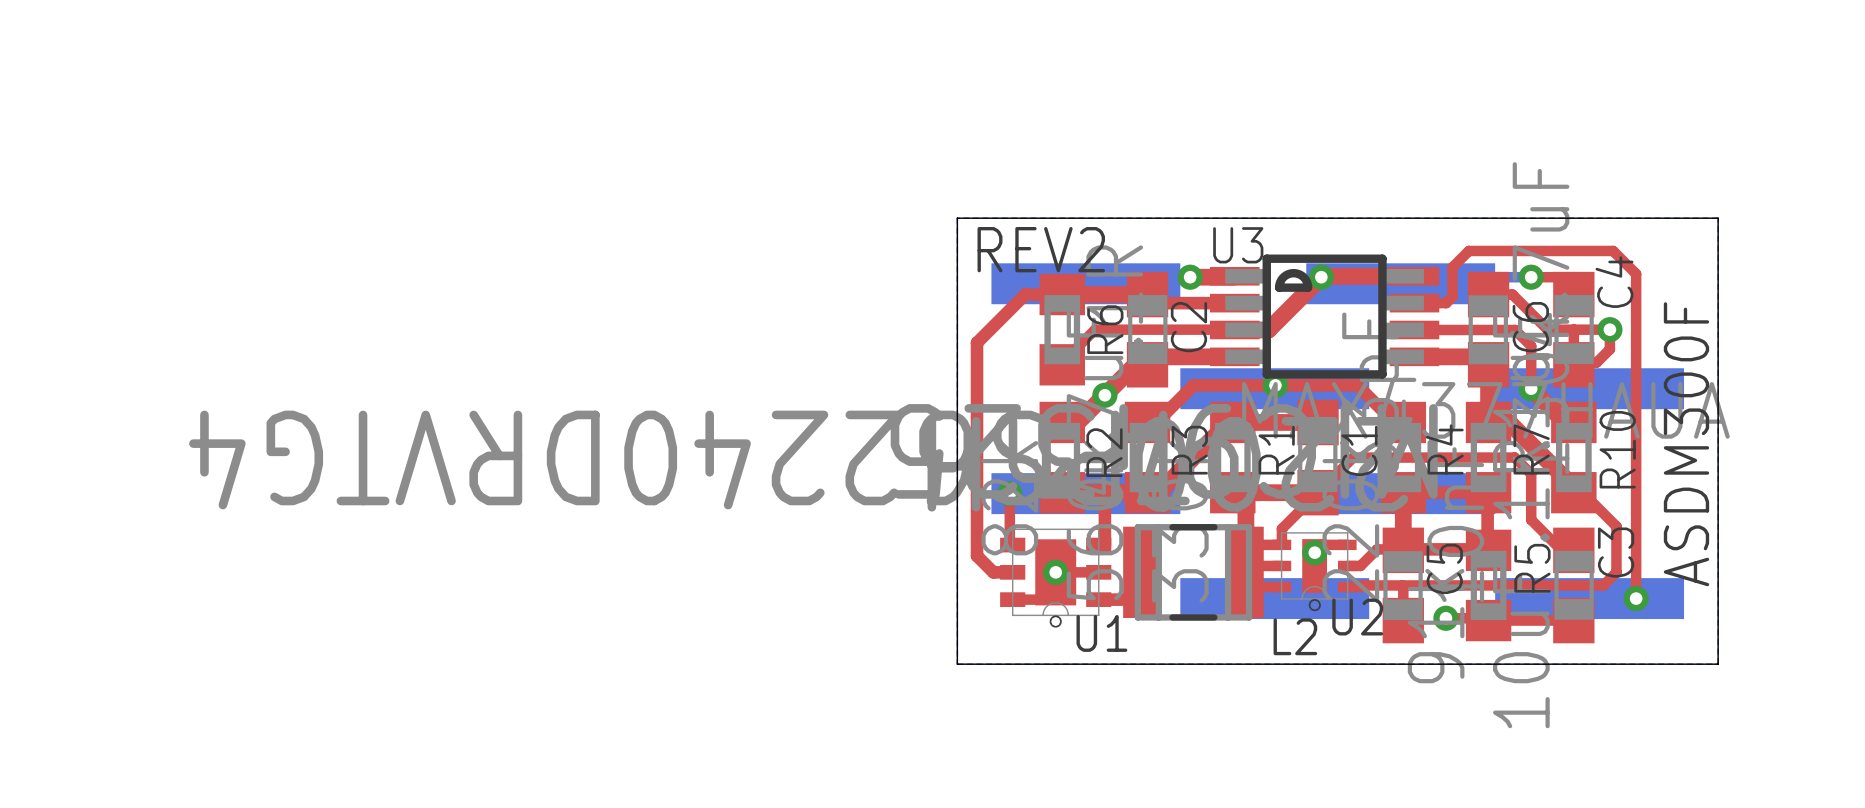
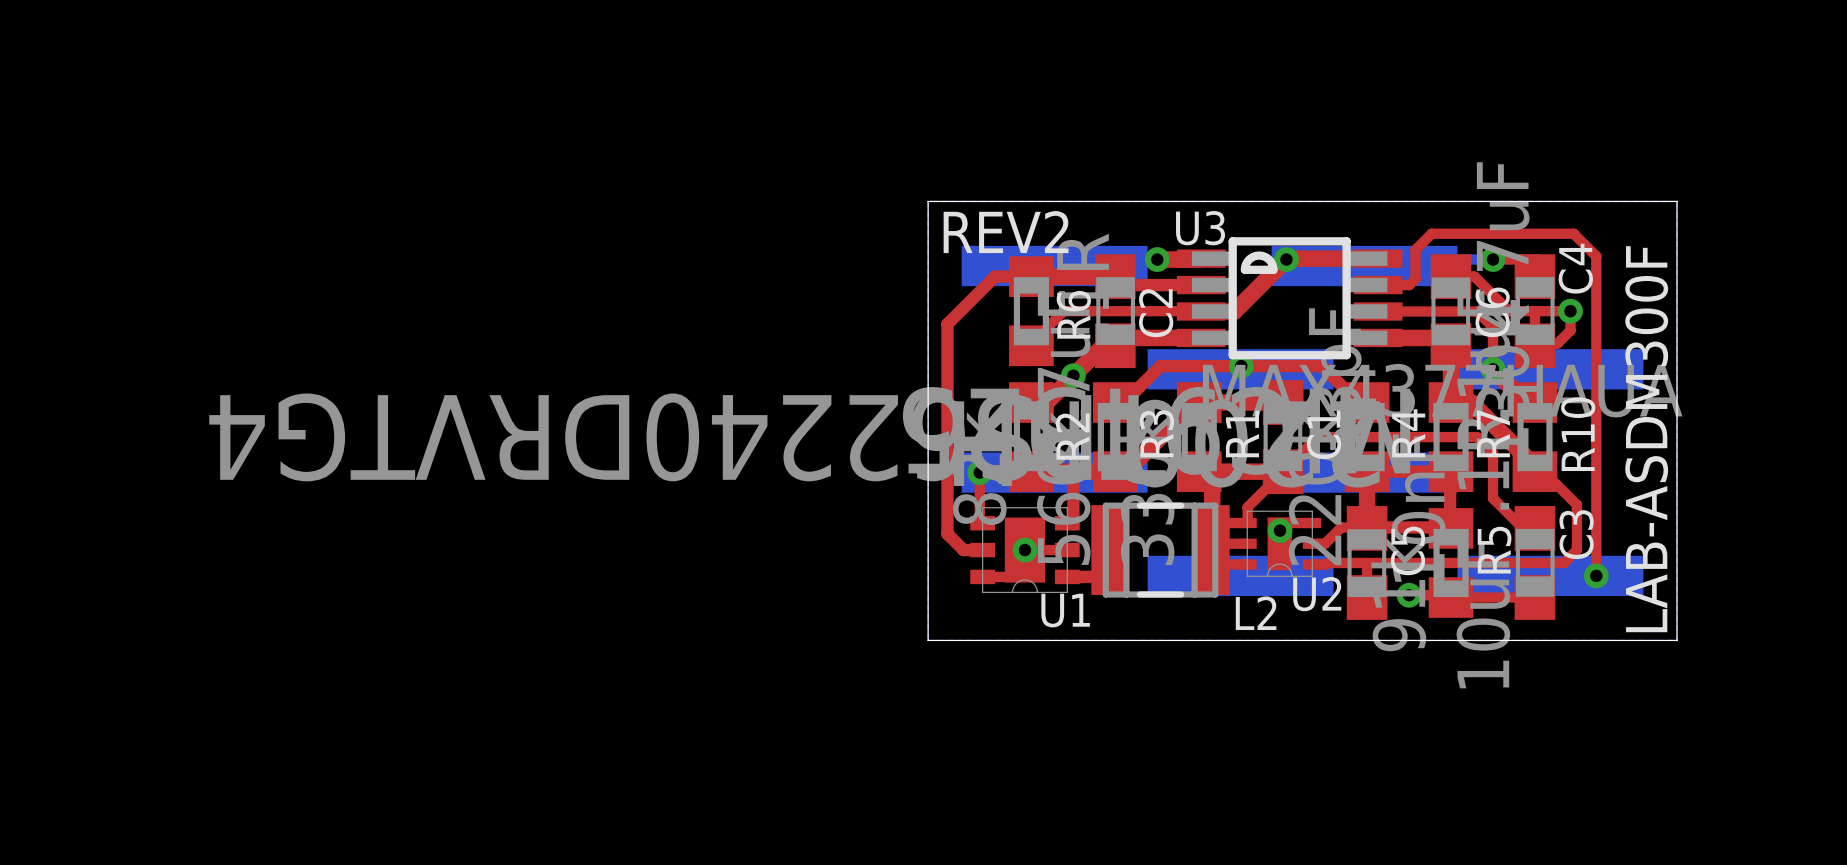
text: ASDM300F (1686, 444) -> LAB-ASDM300F (1646, 439)
drawing: [1308, 599, 1321, 612] -> none
drawing: [1049, 615, 1062, 628] -> none

